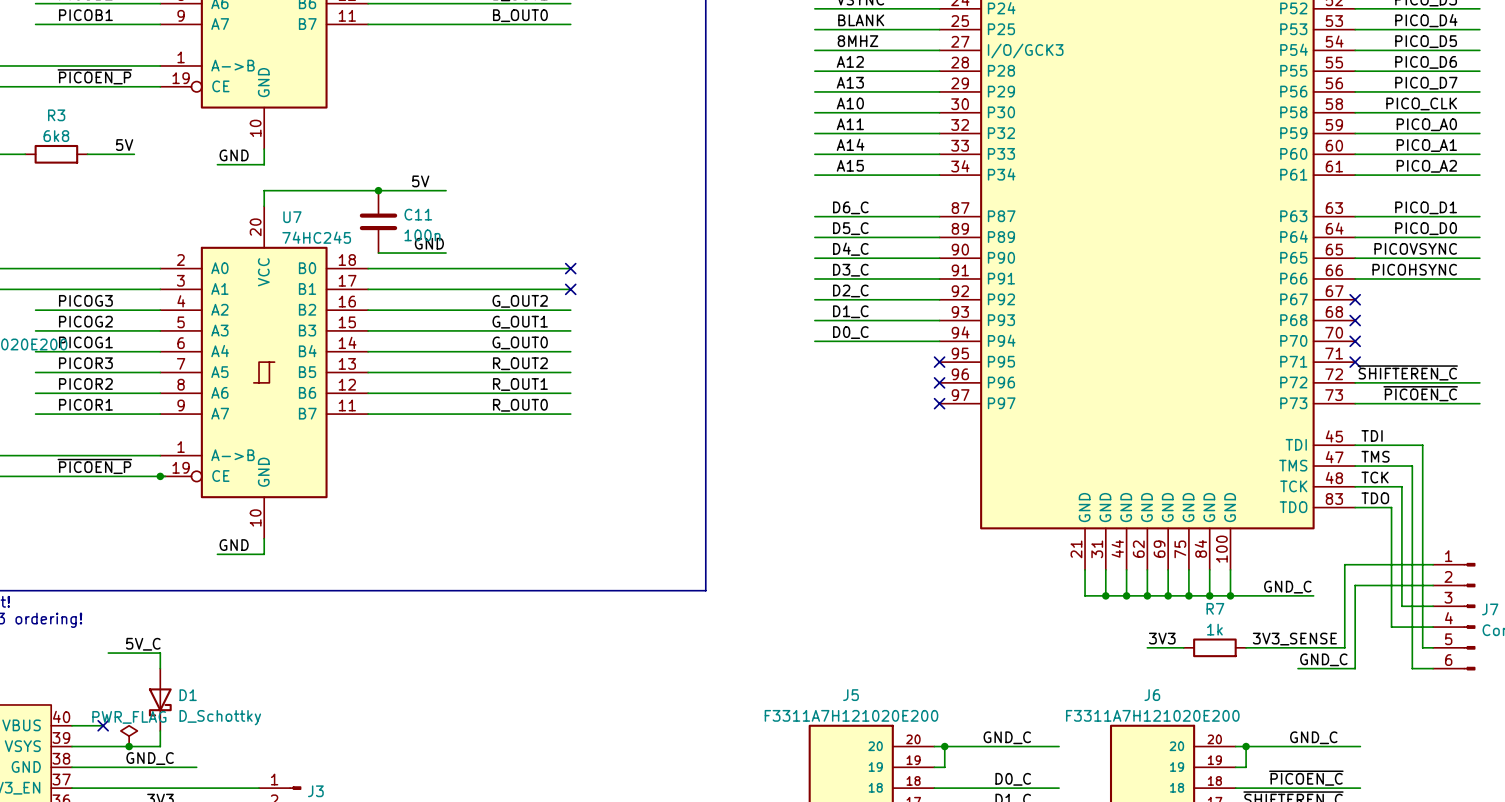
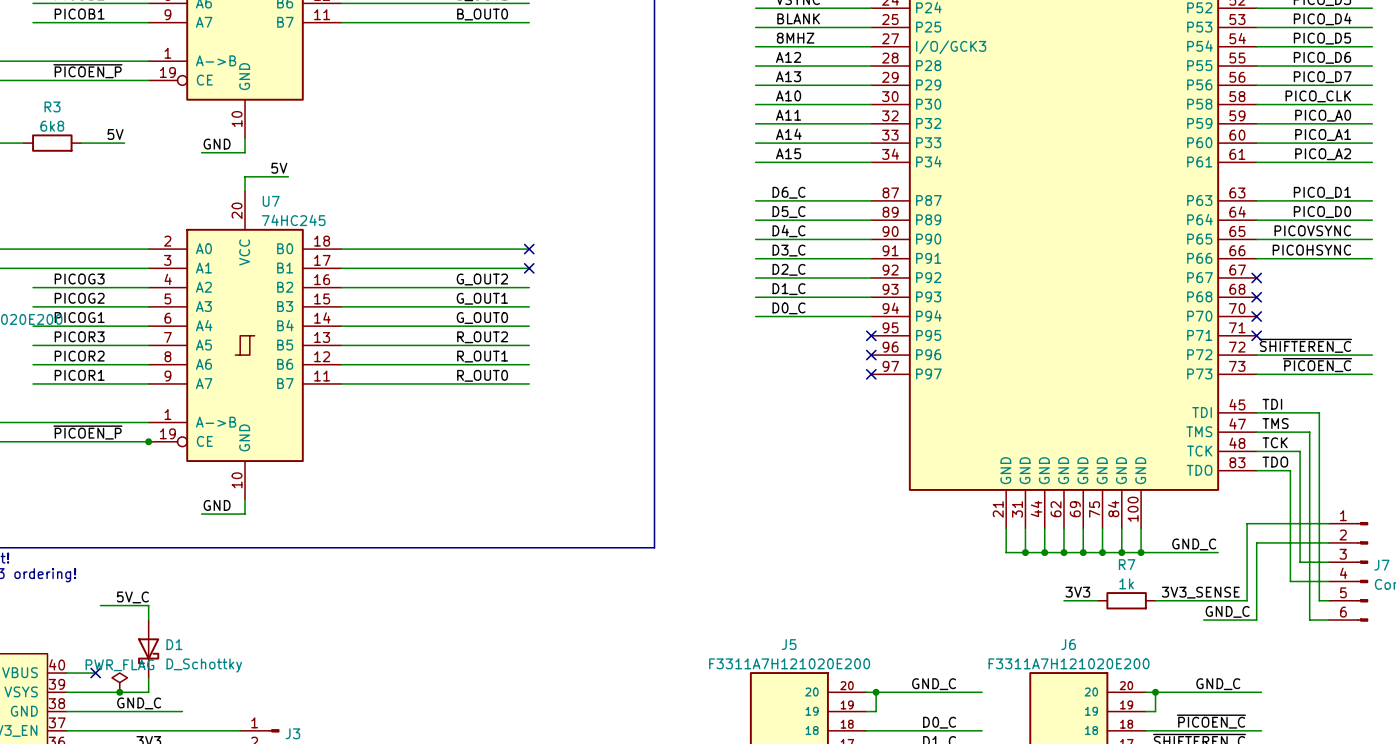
label position: 5V (420, 181) -> 5V (279, 168)
wire: (310, 190) (446, 190) -> none
junction: (378, 190) -> none
C11: 100n (378, 221) -> none
label: GND (429, 243) -> none
wire: (378, 253) (446, 253) -> none

